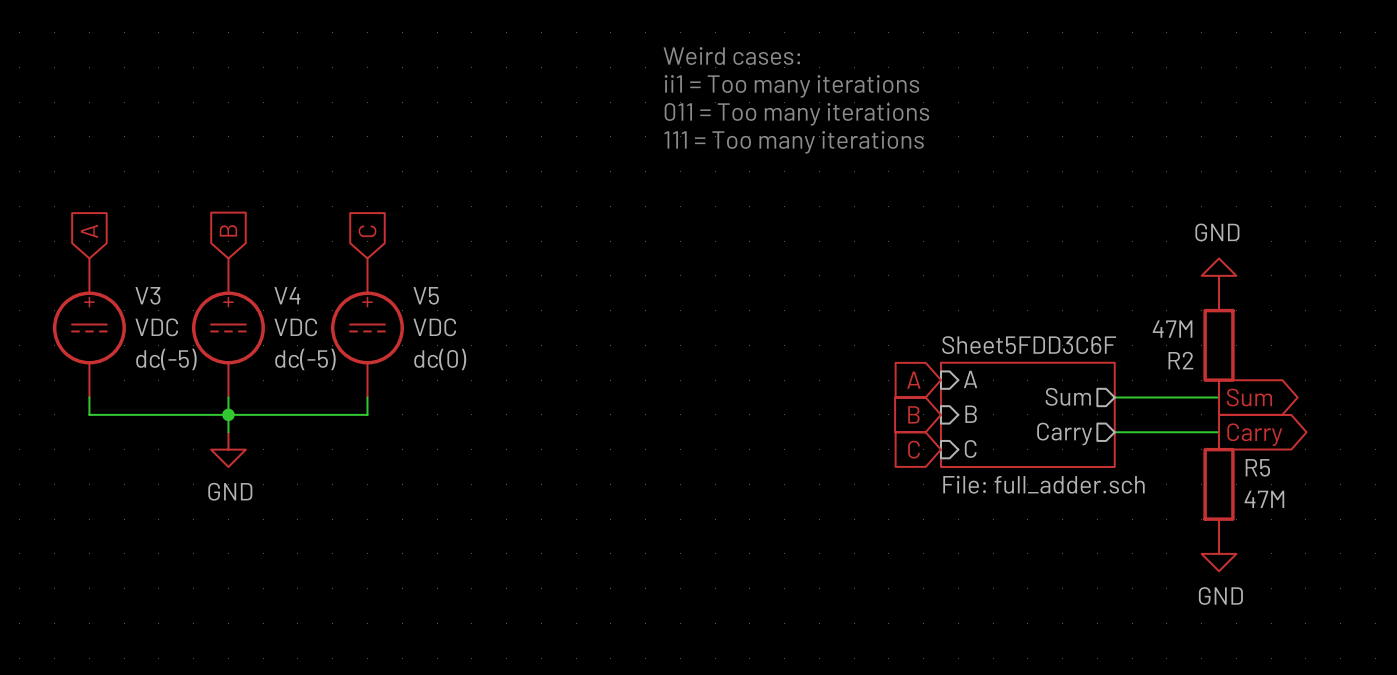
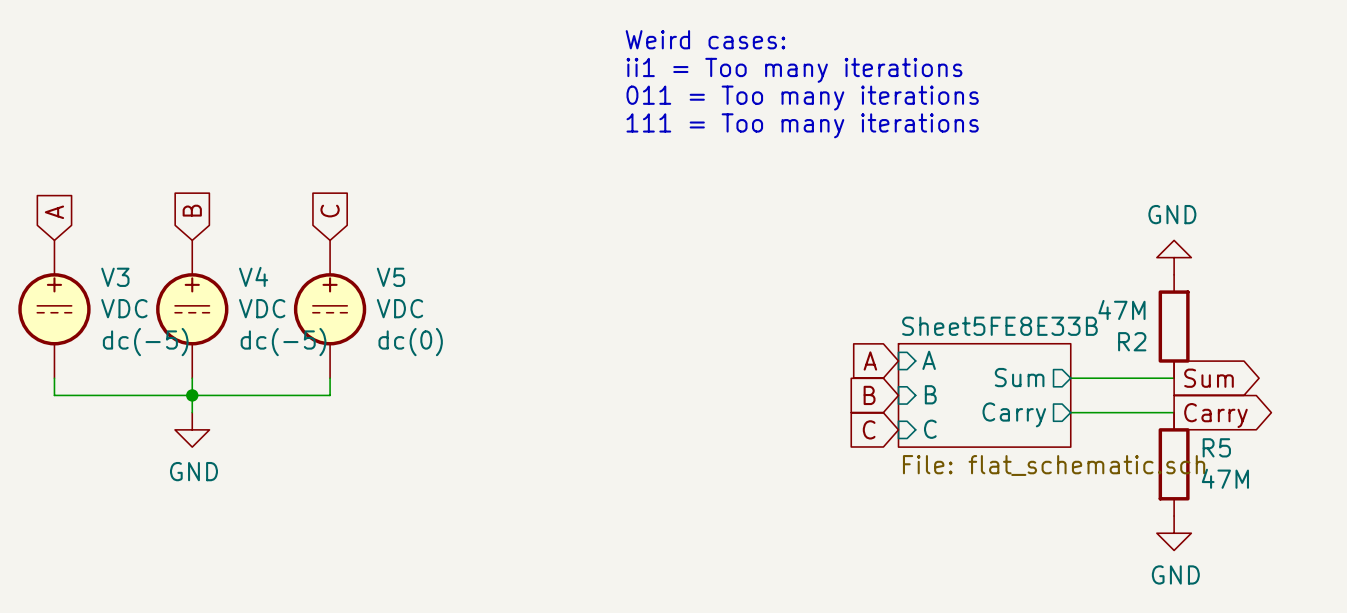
sheet Sheet5FDD3C6F name: Sheet5FDD3C6F (1029, 345) -> Sheet5FE8E33B (999, 326)
sheet Sheet5FDD3C6F value: File: full_adder.sch (1043, 484) -> File: flat_schematic.sch (1054, 465)

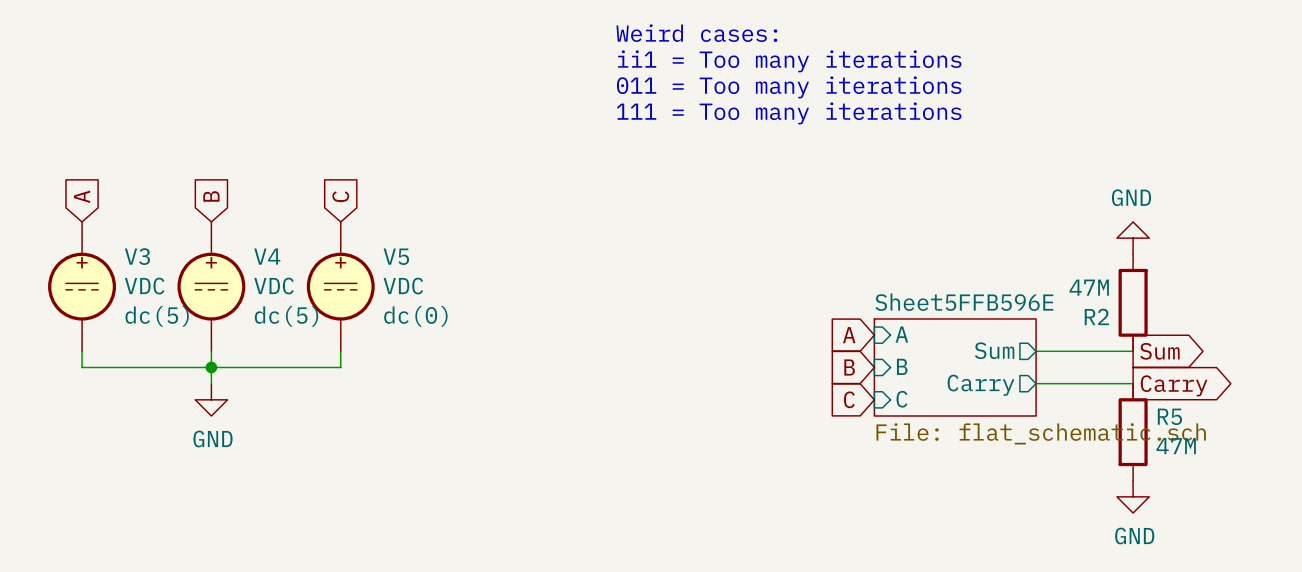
sheet Sheet5FE8E33B name: Sheet5FE8E33B (999, 326) -> Sheet5FFB596E (964, 302)
V3 text: dc(-5) (145, 342) -> dc(5) (157, 316)
V4 text: dc(-5) (283, 342) -> dc(5) (286, 316)

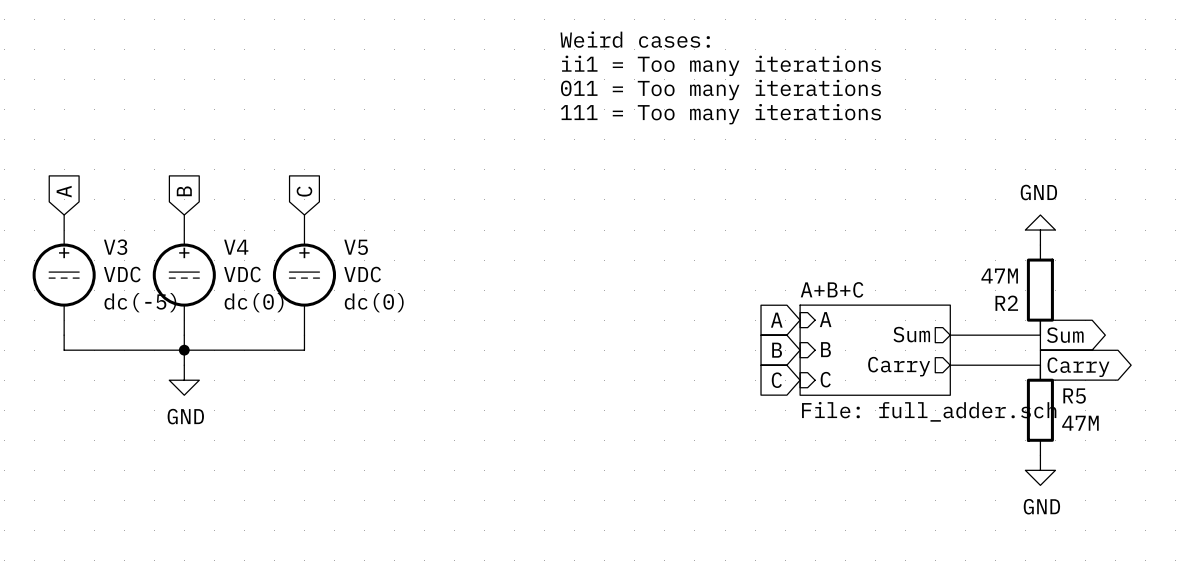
sheet Sheet5FFB596E name: Sheet5FFB596E (964, 302) -> A+B+C (832, 289)
V3 text: dc(5) (157, 316) -> dc(-5) (140, 302)
V4 text: dc(5) (286, 316) -> dc(0) (254, 302)
sheet Sheet5FFB596E value: File: flat_schematic.sch (1041, 433) -> File: full_adder.sch (929, 411)

